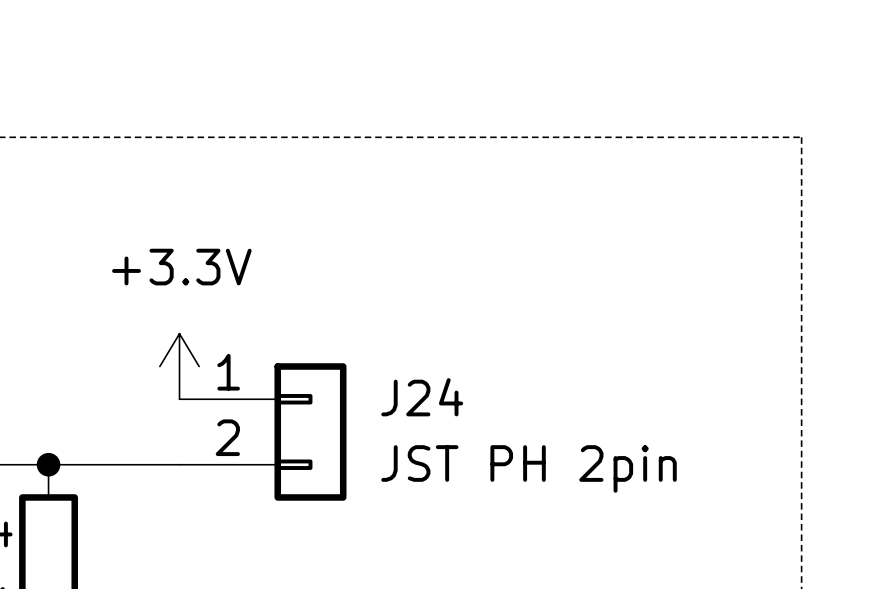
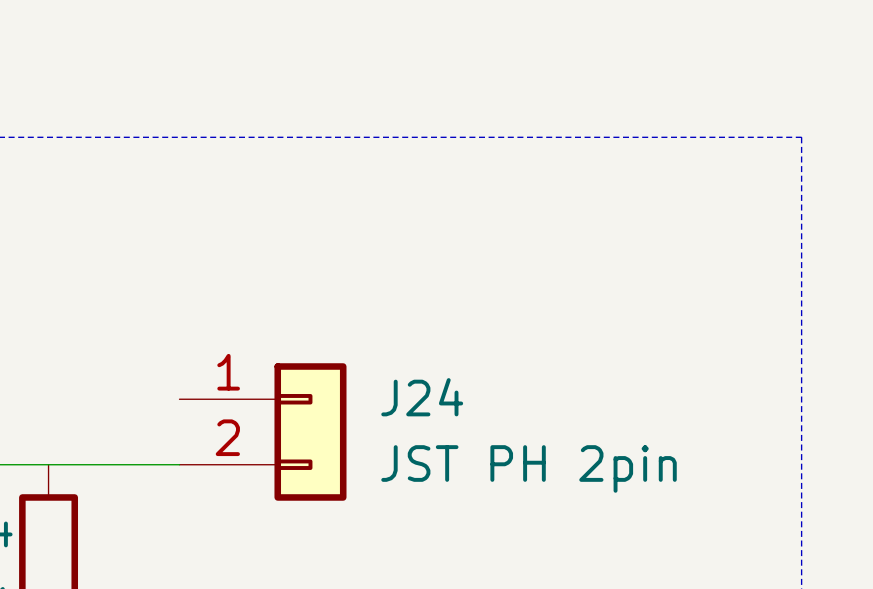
power symbol: +3.3V (179, 366) -> none
junction: (48, 464) -> none

